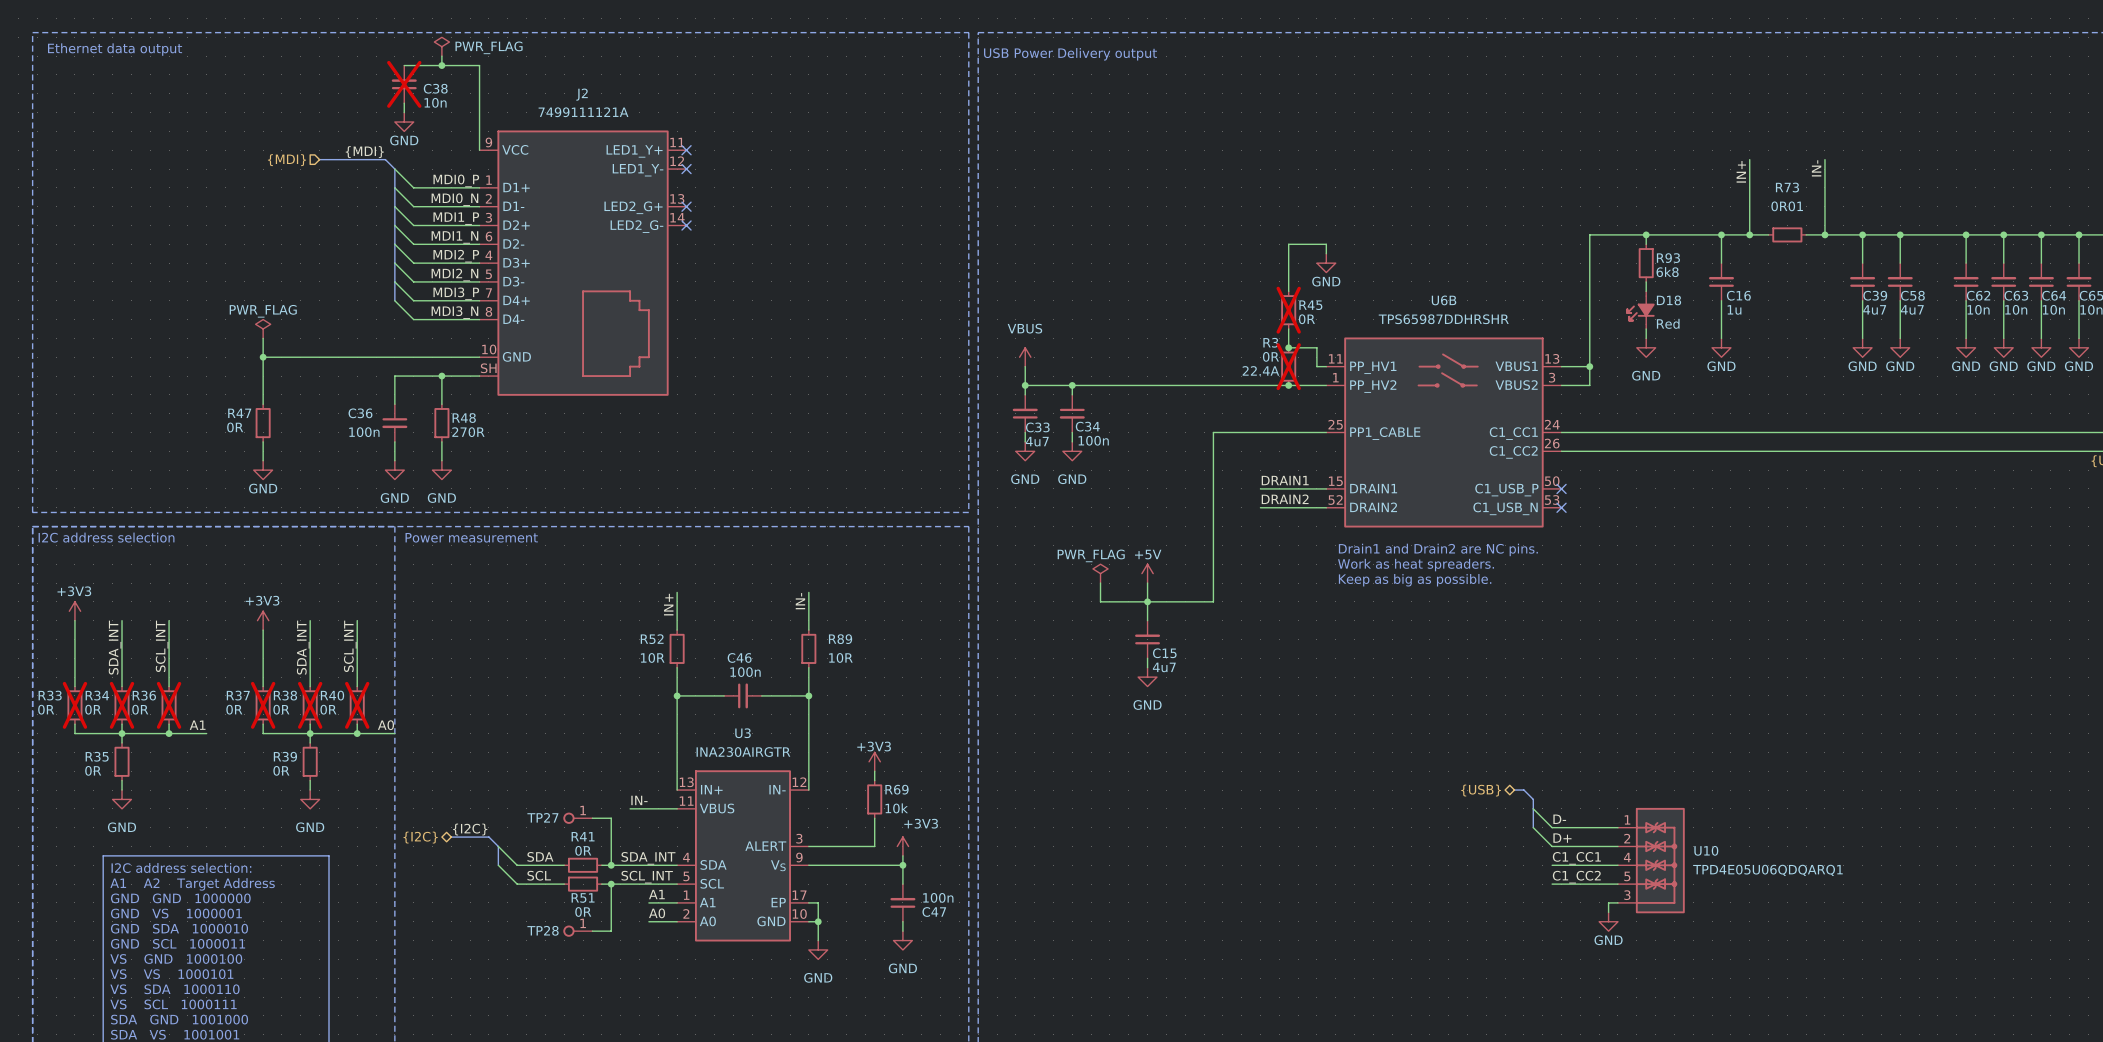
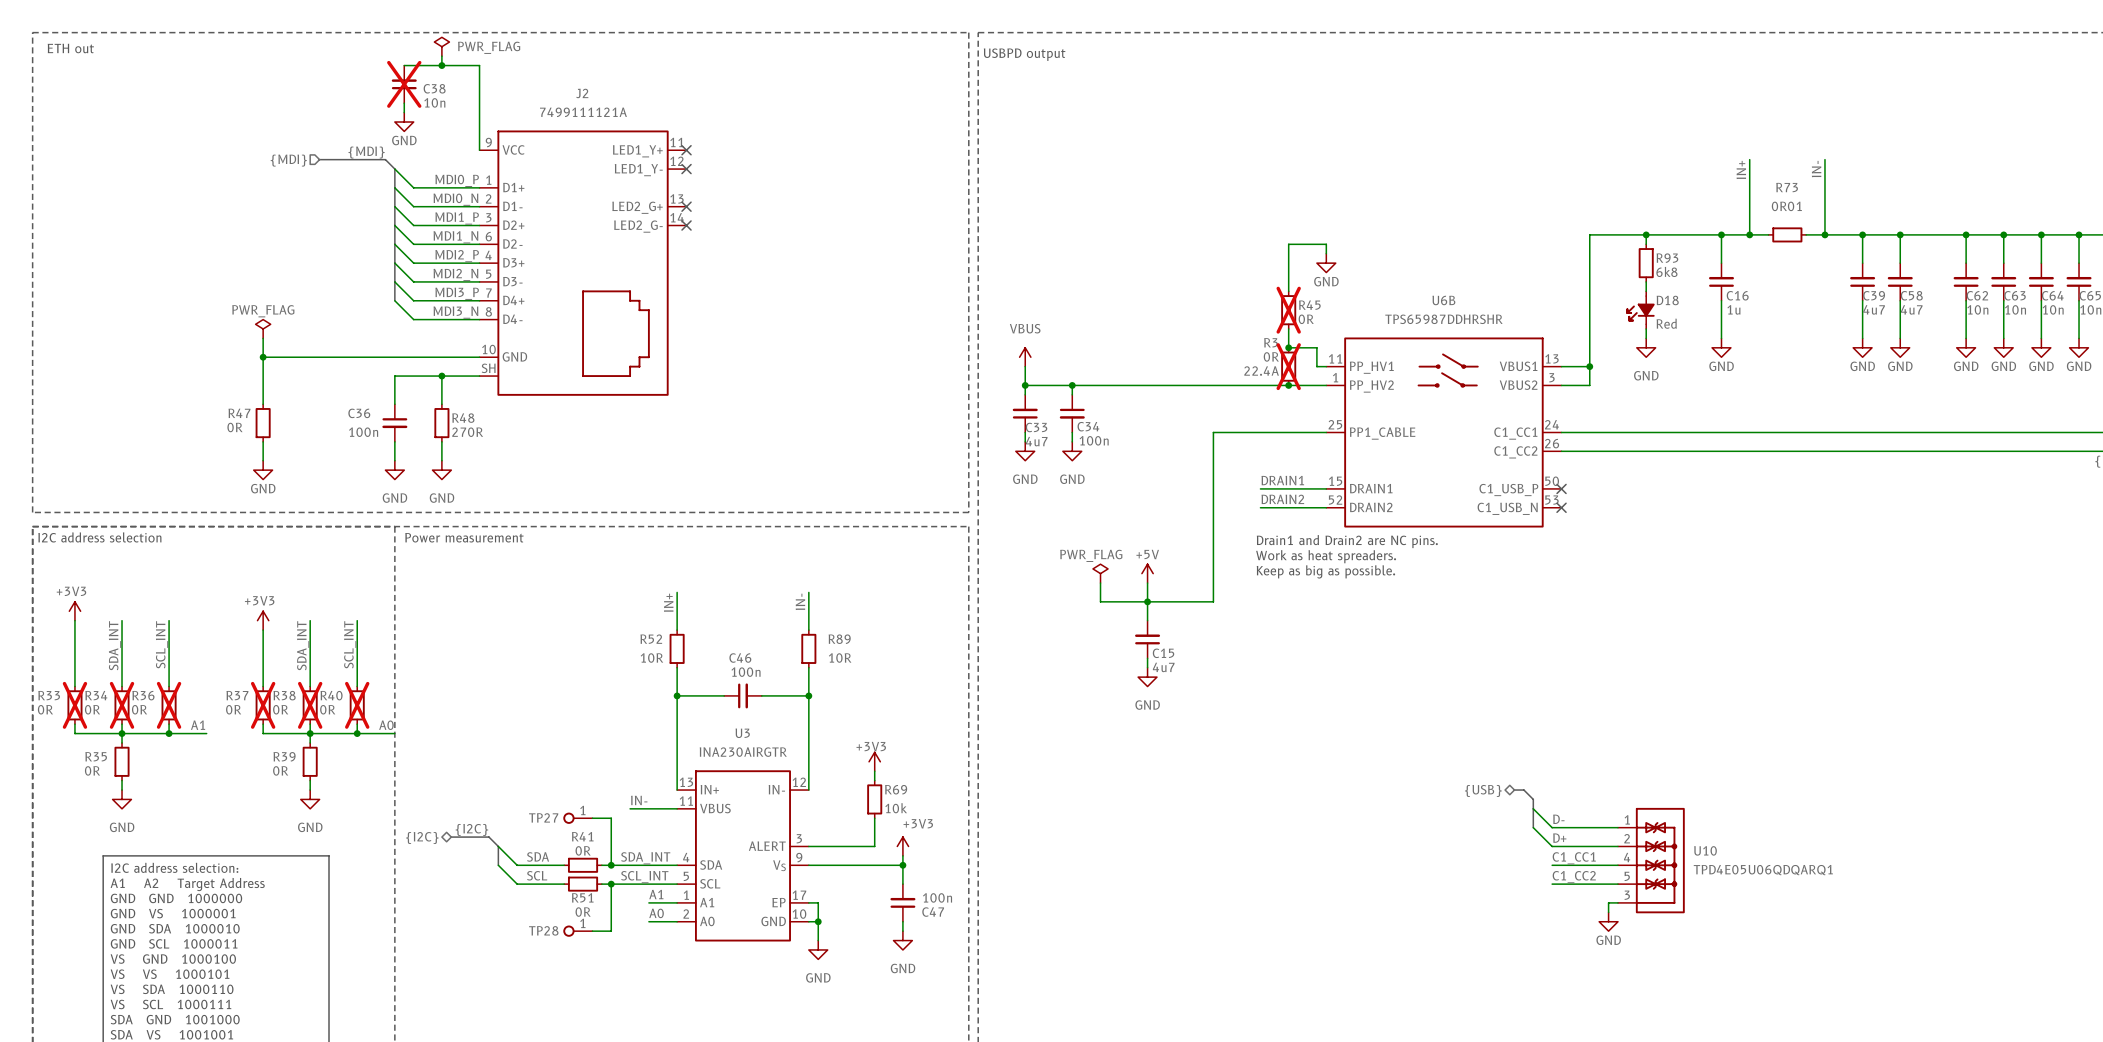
text: Ethernet data output (115, 49) -> ETH out (70, 48)
text: USB Power Delivery output (1070, 54) -> USBPD output (1024, 54)
text position: Drain1 and Drain2 are NC pins. (1438, 549) -> Drain1 and Drain2 are NC pins. (1347, 541)
text position: Work as heat spreaders. (1416, 565) -> Work as heat spreaders. (1326, 556)
text position: Keep as big as possible. (1415, 580) -> Keep as big as possible. (1325, 571)

